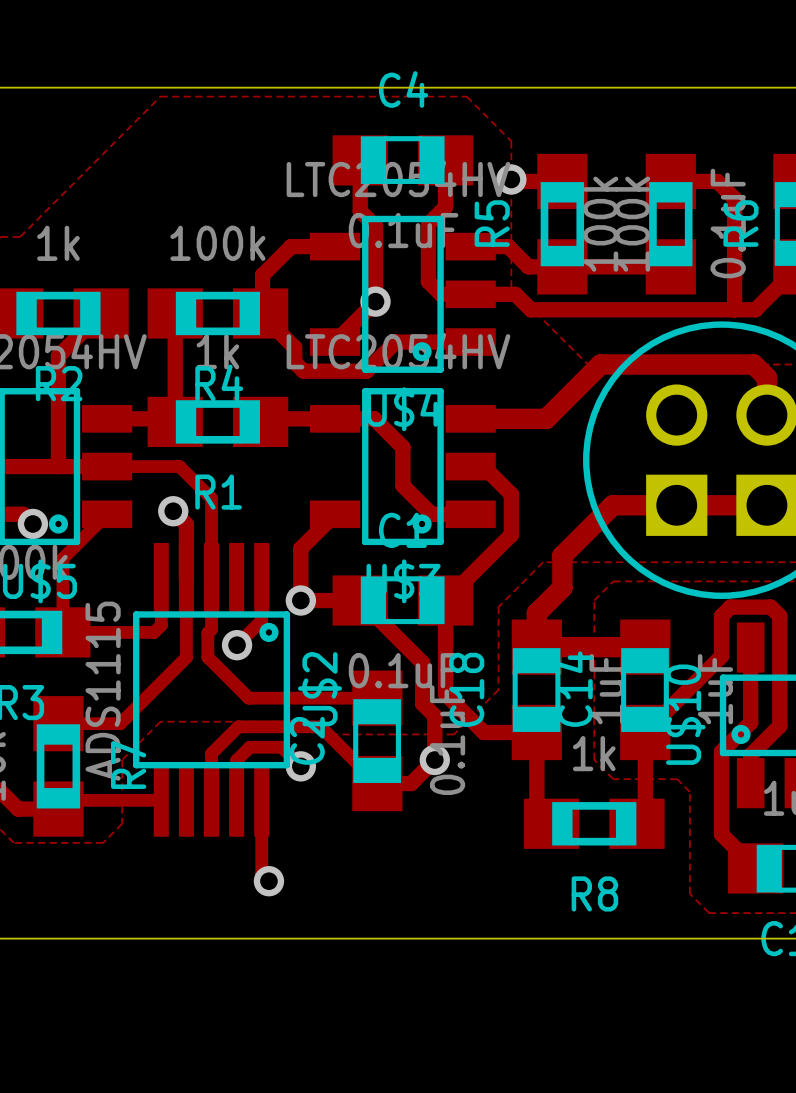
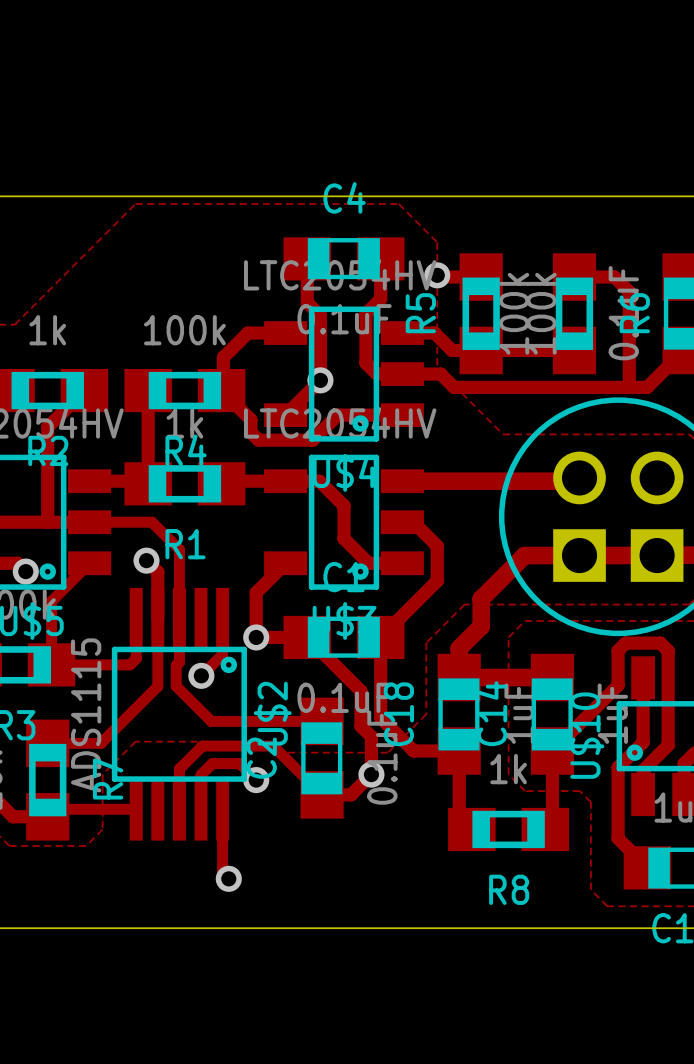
track: (766, 415) (766, 377) (753, 364) (600, 364) (546, 418) -> (579, 477) (576, 481) (467, 481)

